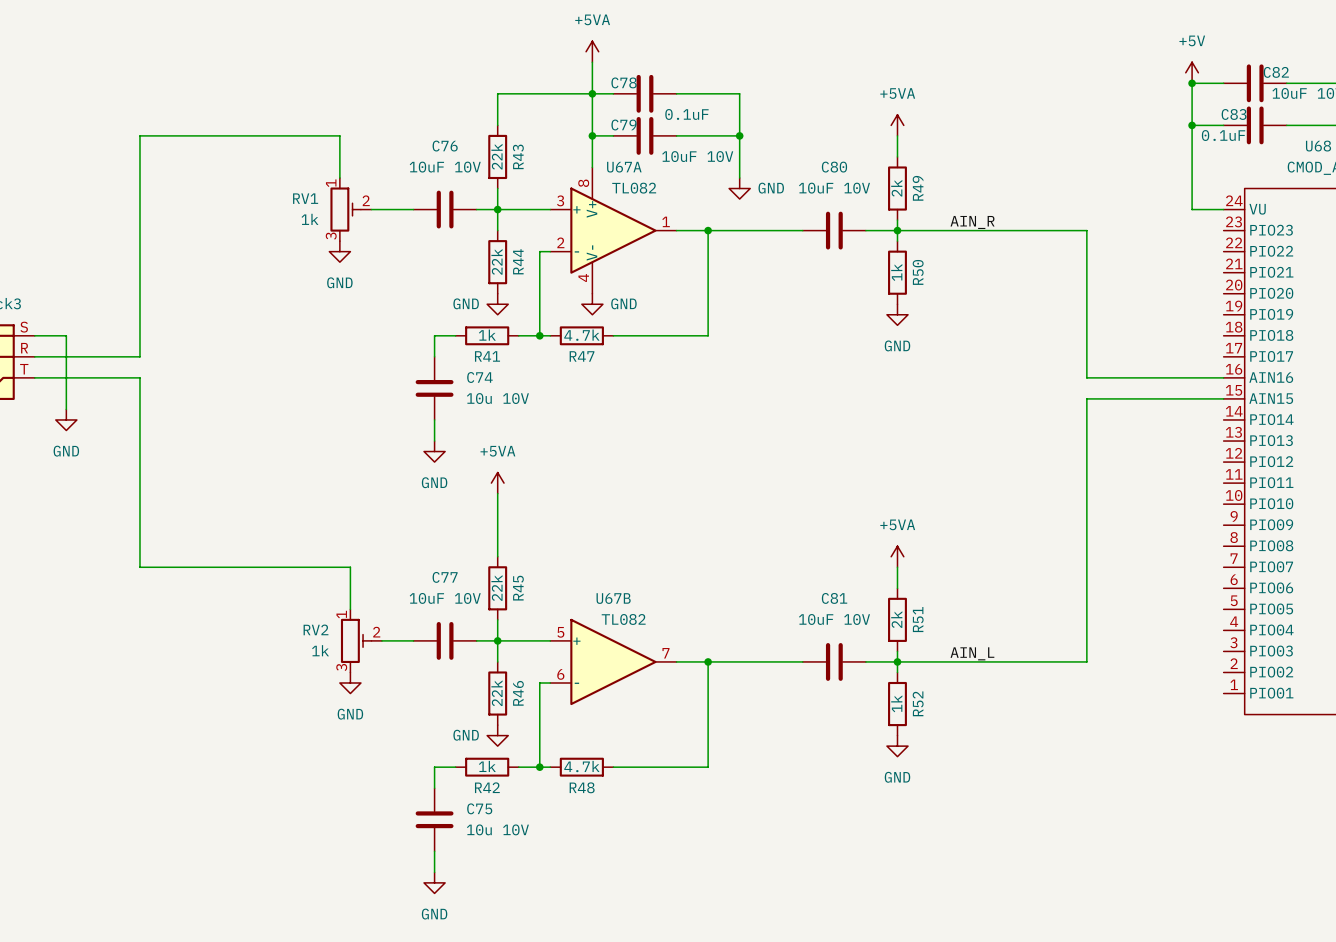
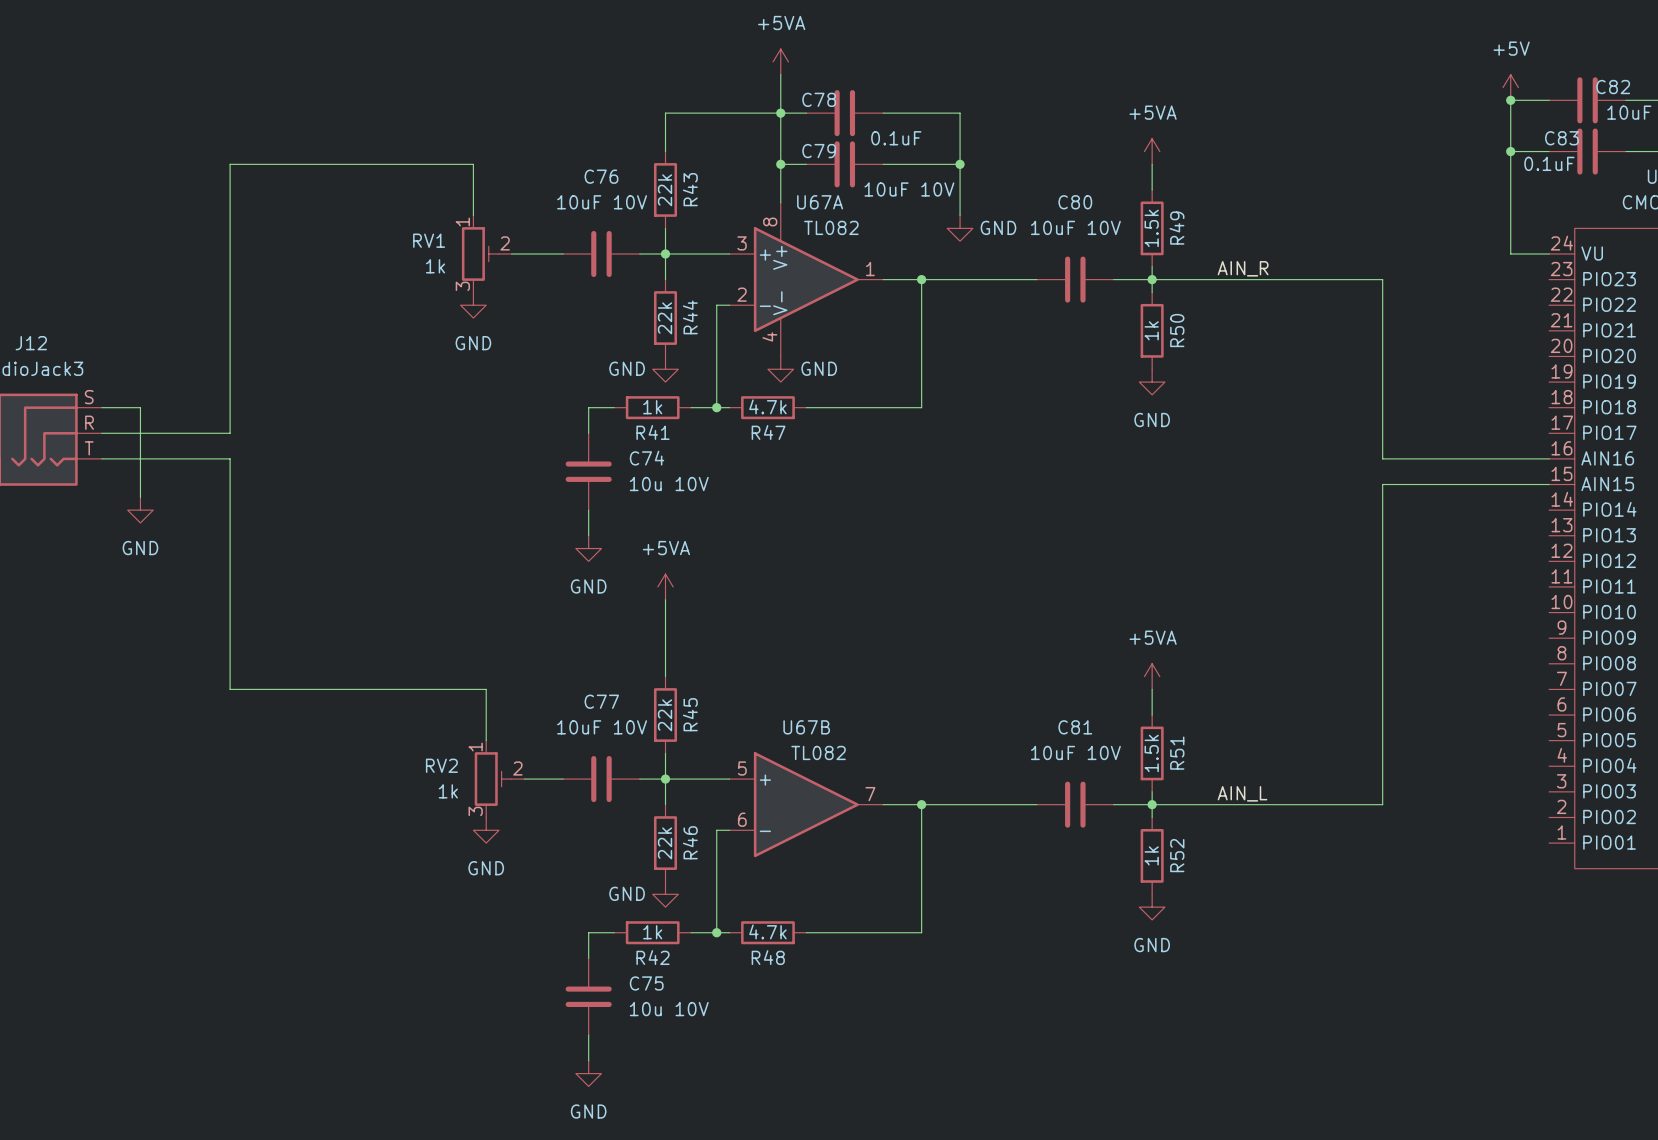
R49 value: 2k (896, 188) -> 1.5k (1151, 228)
R51 value: 2k (896, 619) -> 1.5k (1151, 753)

